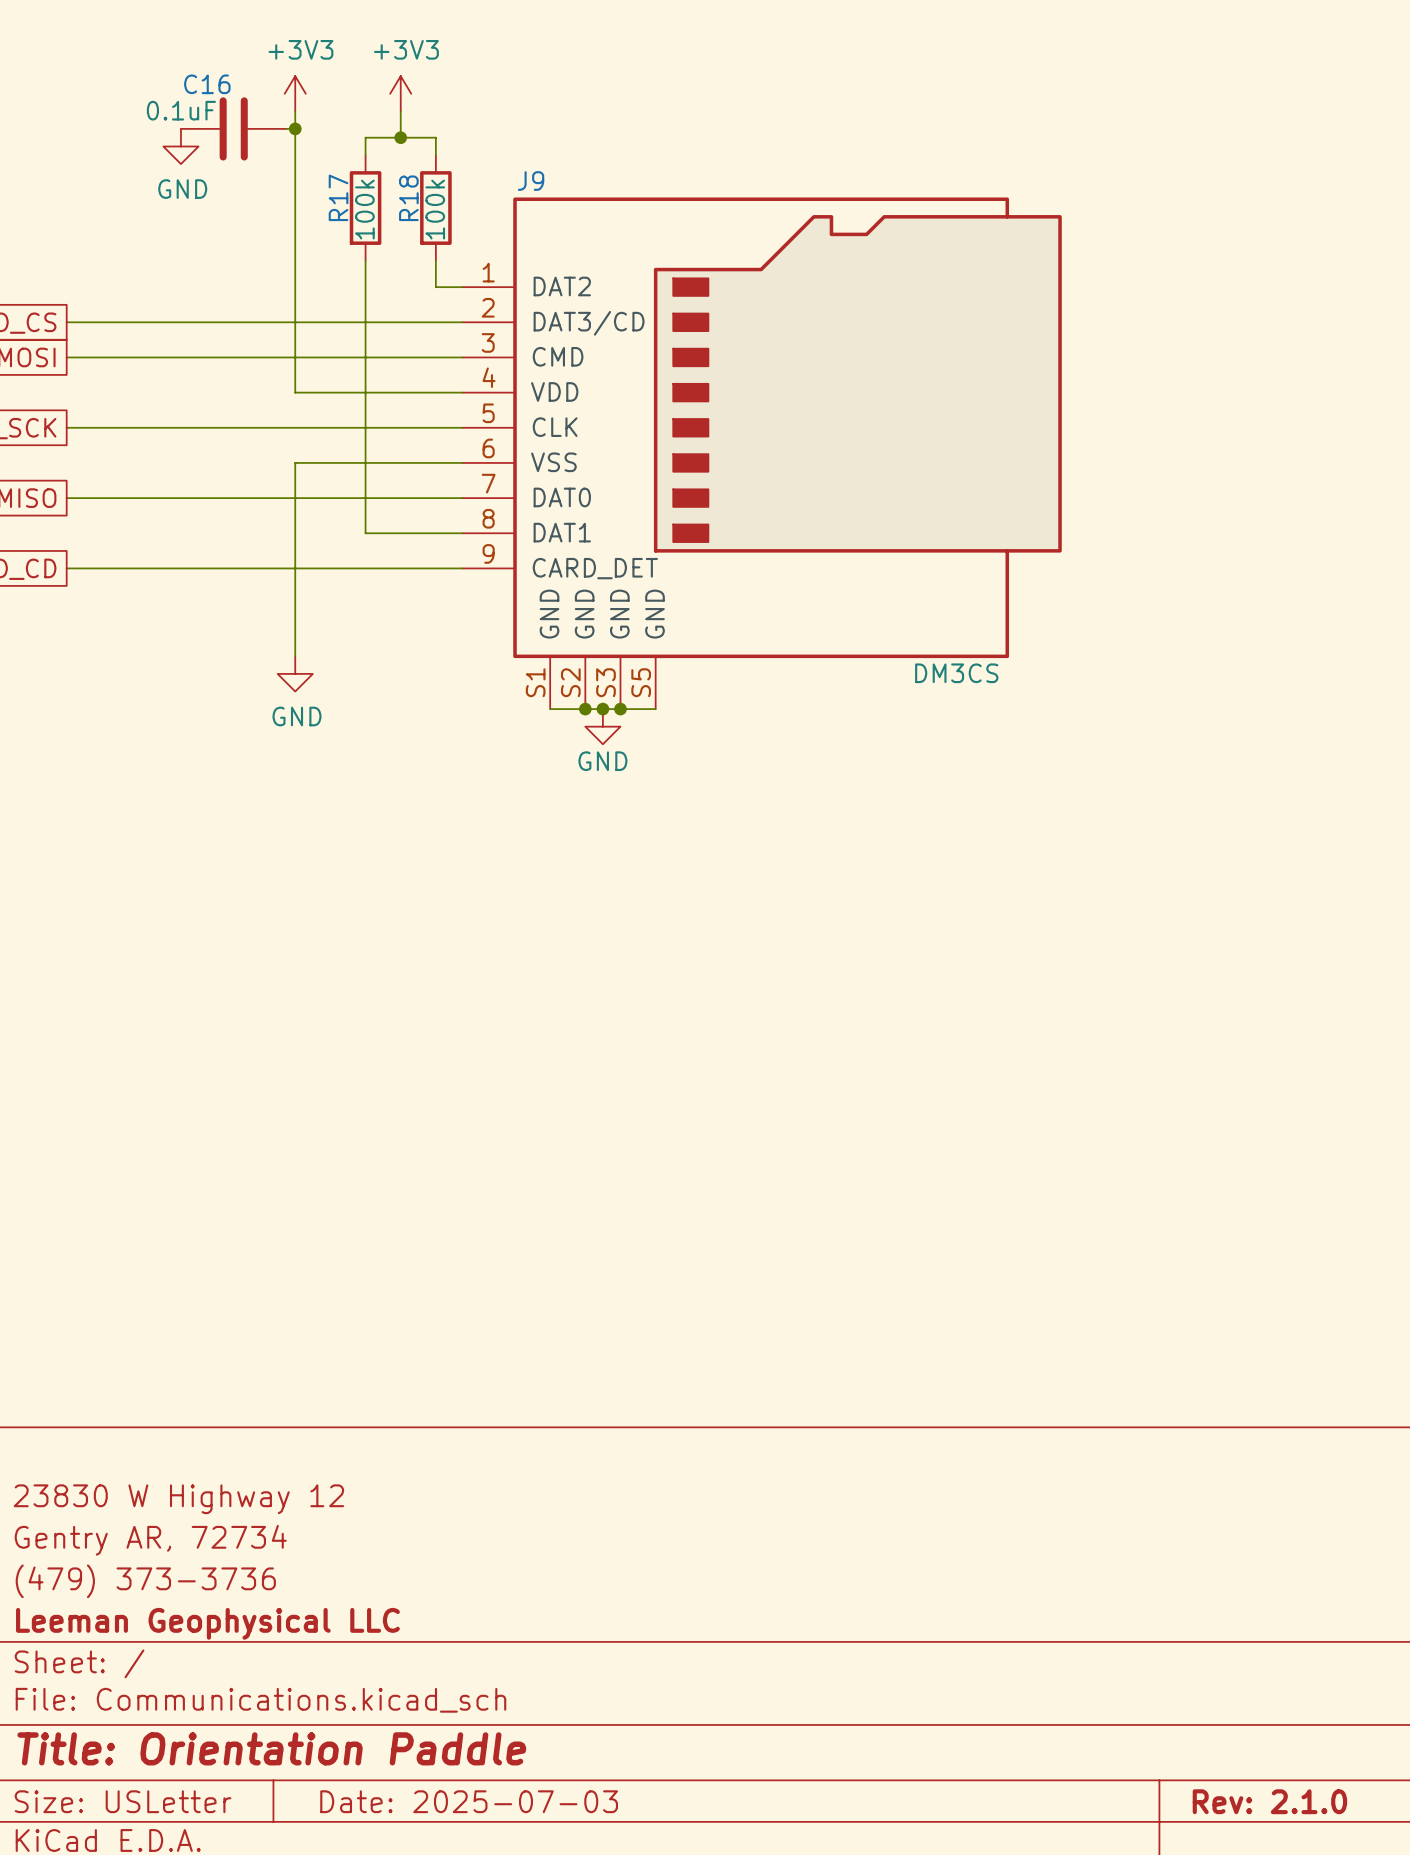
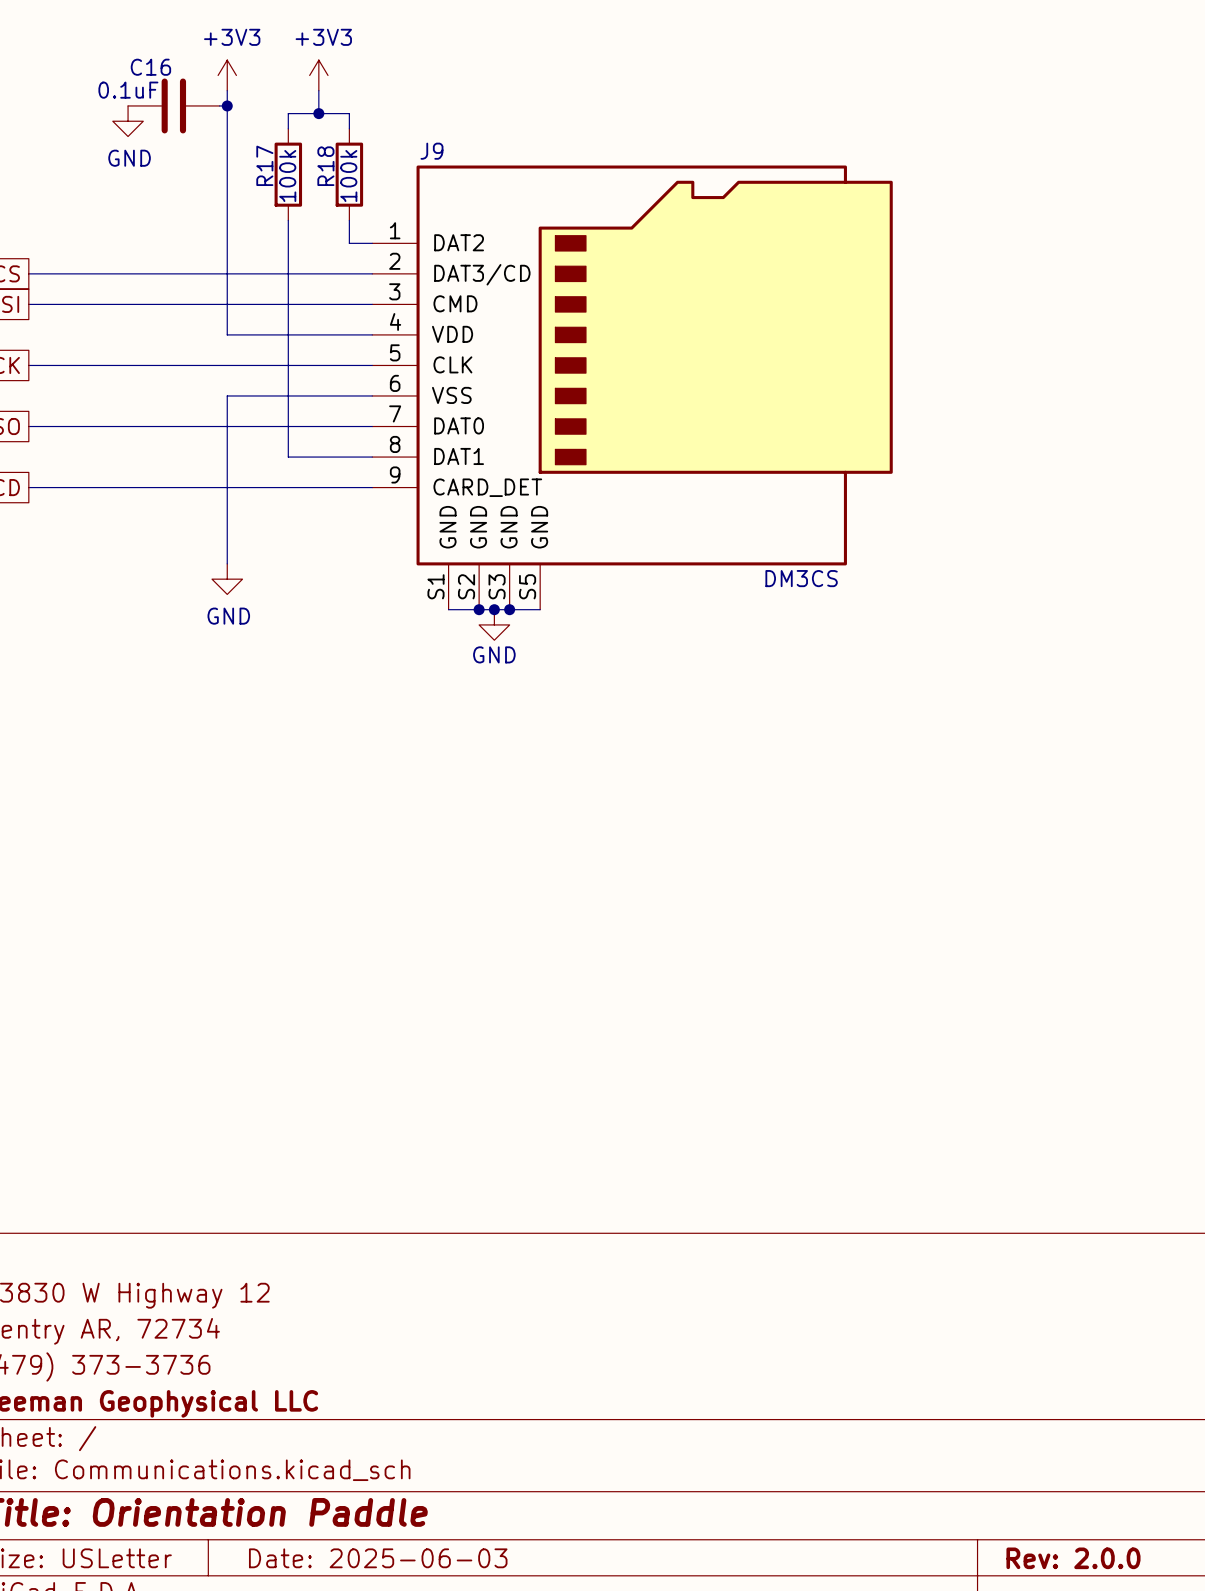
title block: Date: 2025-07-03 (469, 1801) -> Date: 2025-06-03 (378, 1558)
title block: Rev: 2.1.0 (1269, 1801) -> Rev: 2.0.0 (1073, 1558)

